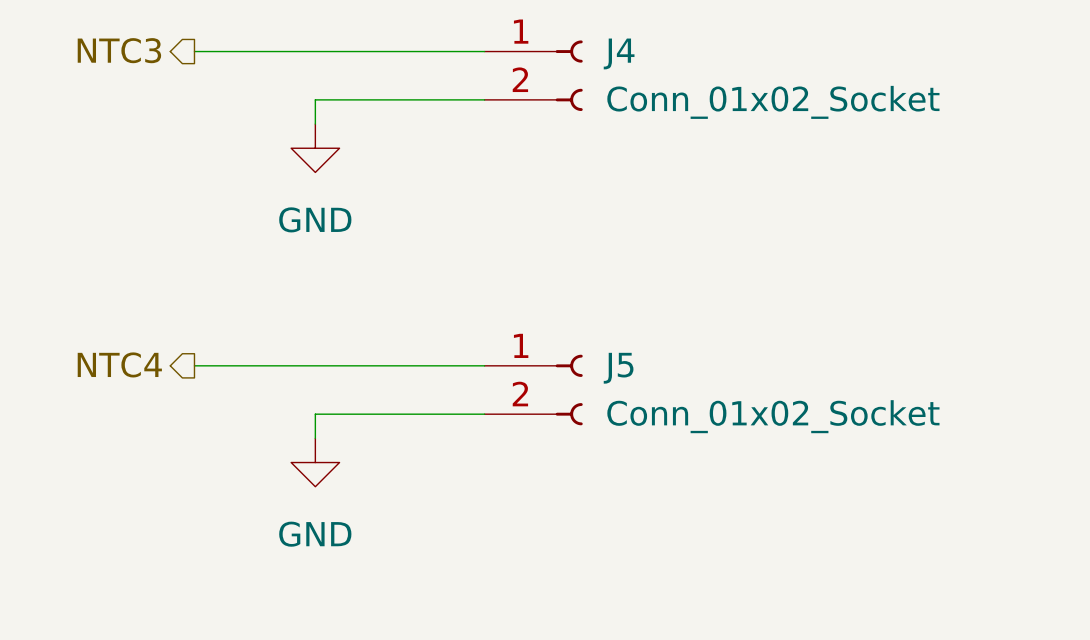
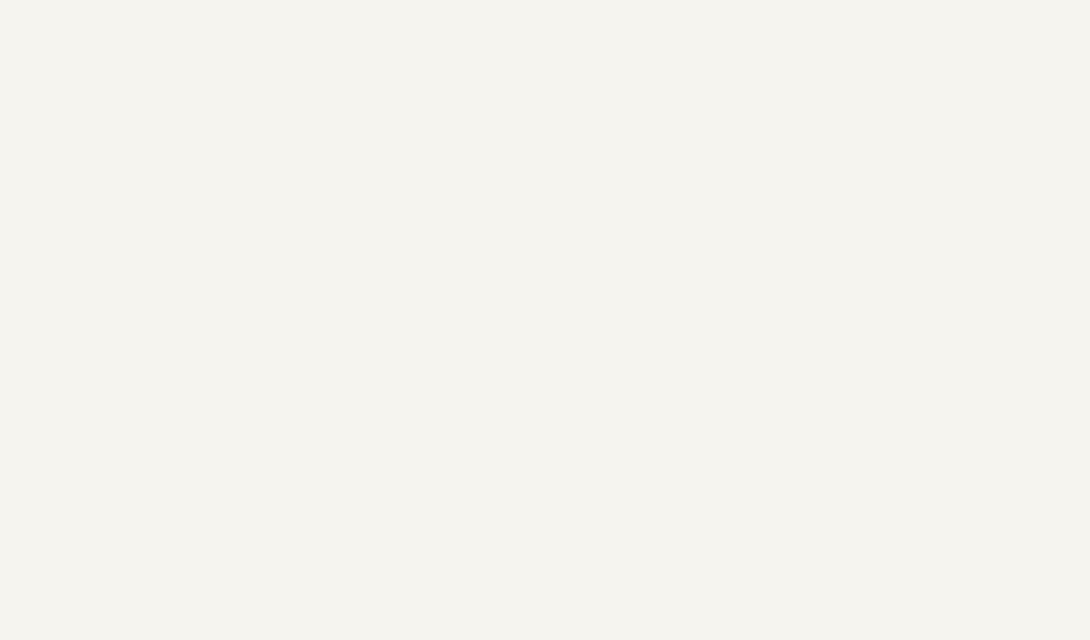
hierarchical label: NTC3 (119, 50) -> none
wire: (194, 51) (484, 51) -> none
J4: Conn_01x02_Socket (533, 75) -> none
wire: (484, 99) (315, 99) (315, 124) -> none
power symbol: GND (315, 148) -> none
hierarchical label: NTC4 (119, 364) -> none
wire: (194, 365) (484, 365) -> none
J5: Conn_01x02_Socket (533, 390) -> none
wire: (484, 414) (315, 414) (315, 438) -> none
power symbol: GND (315, 462) -> none

